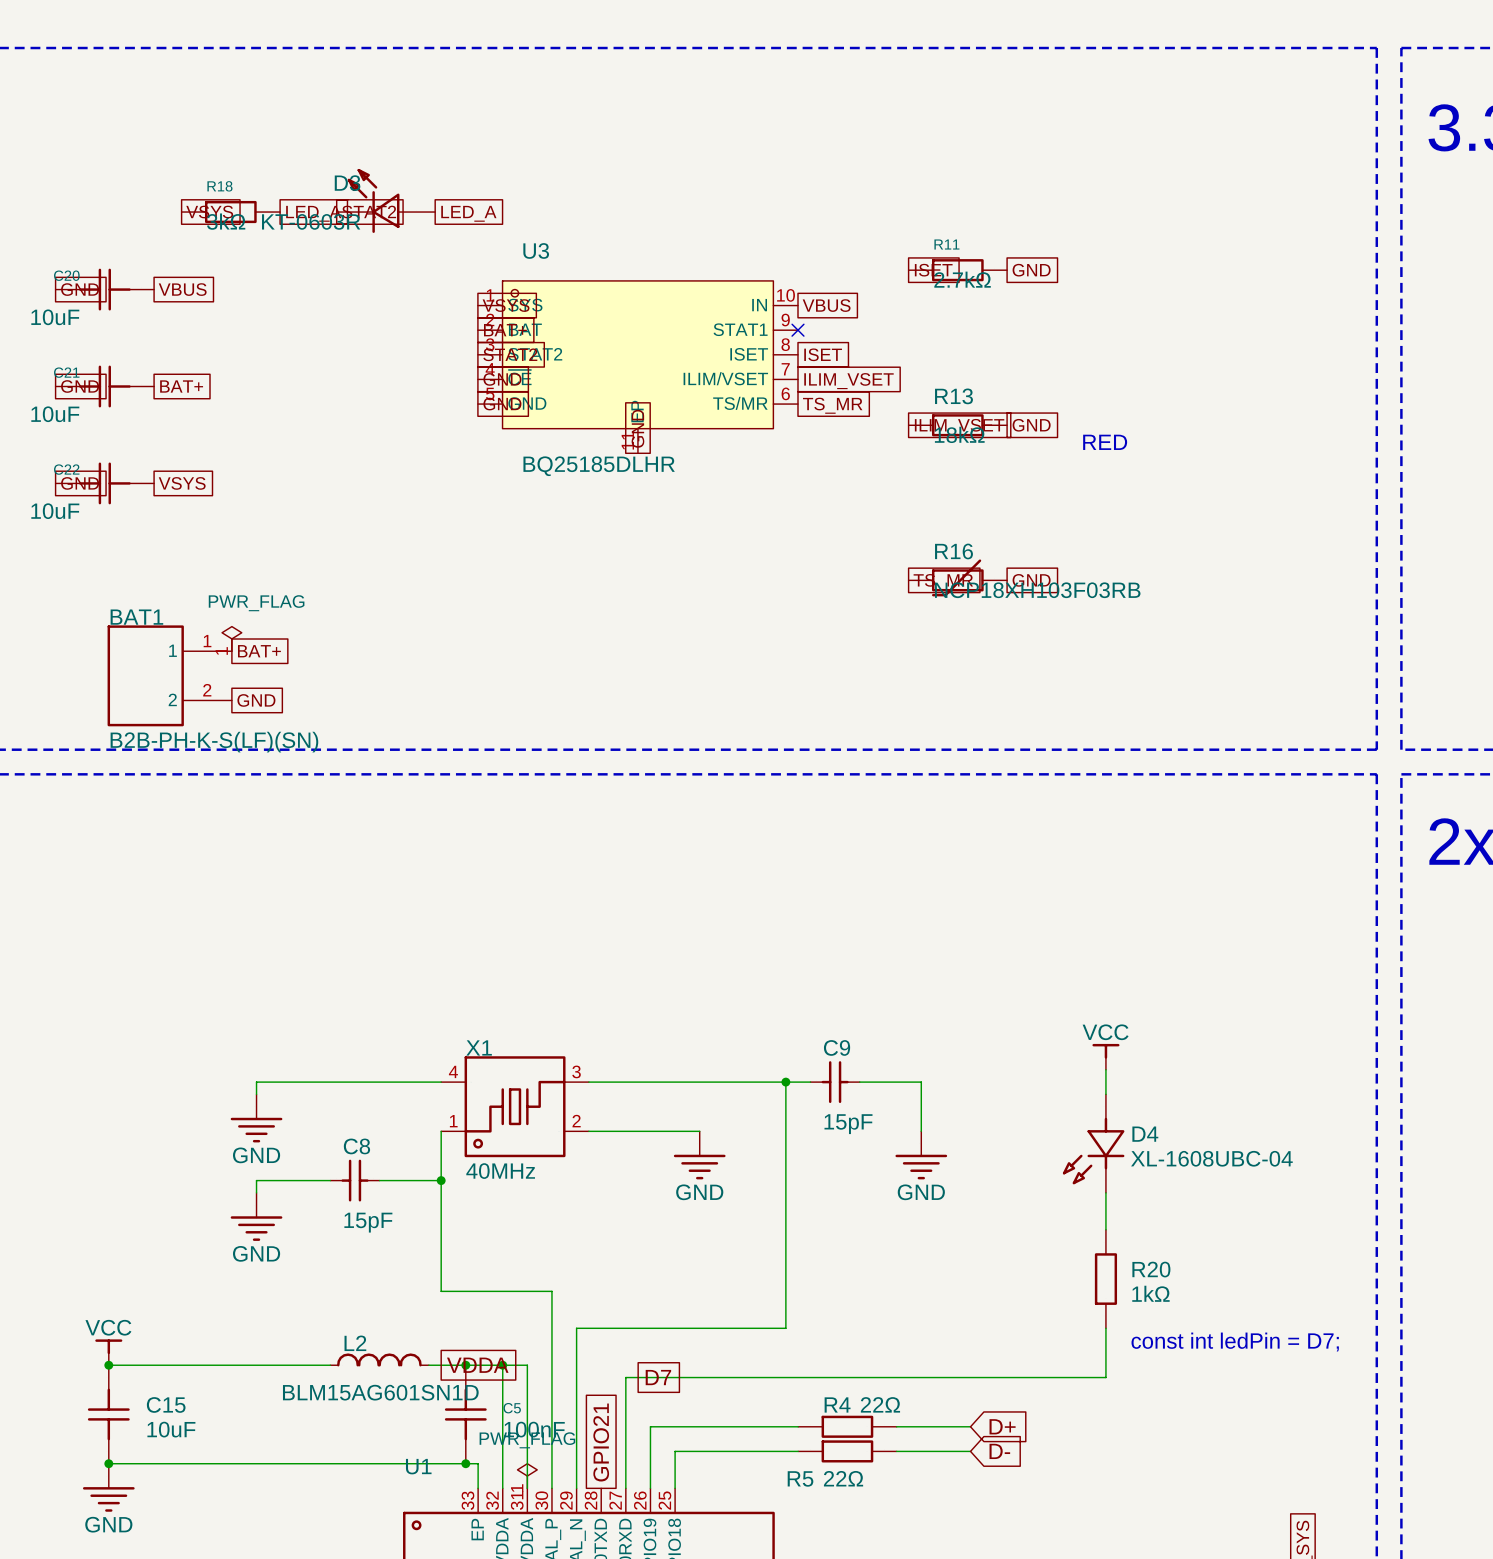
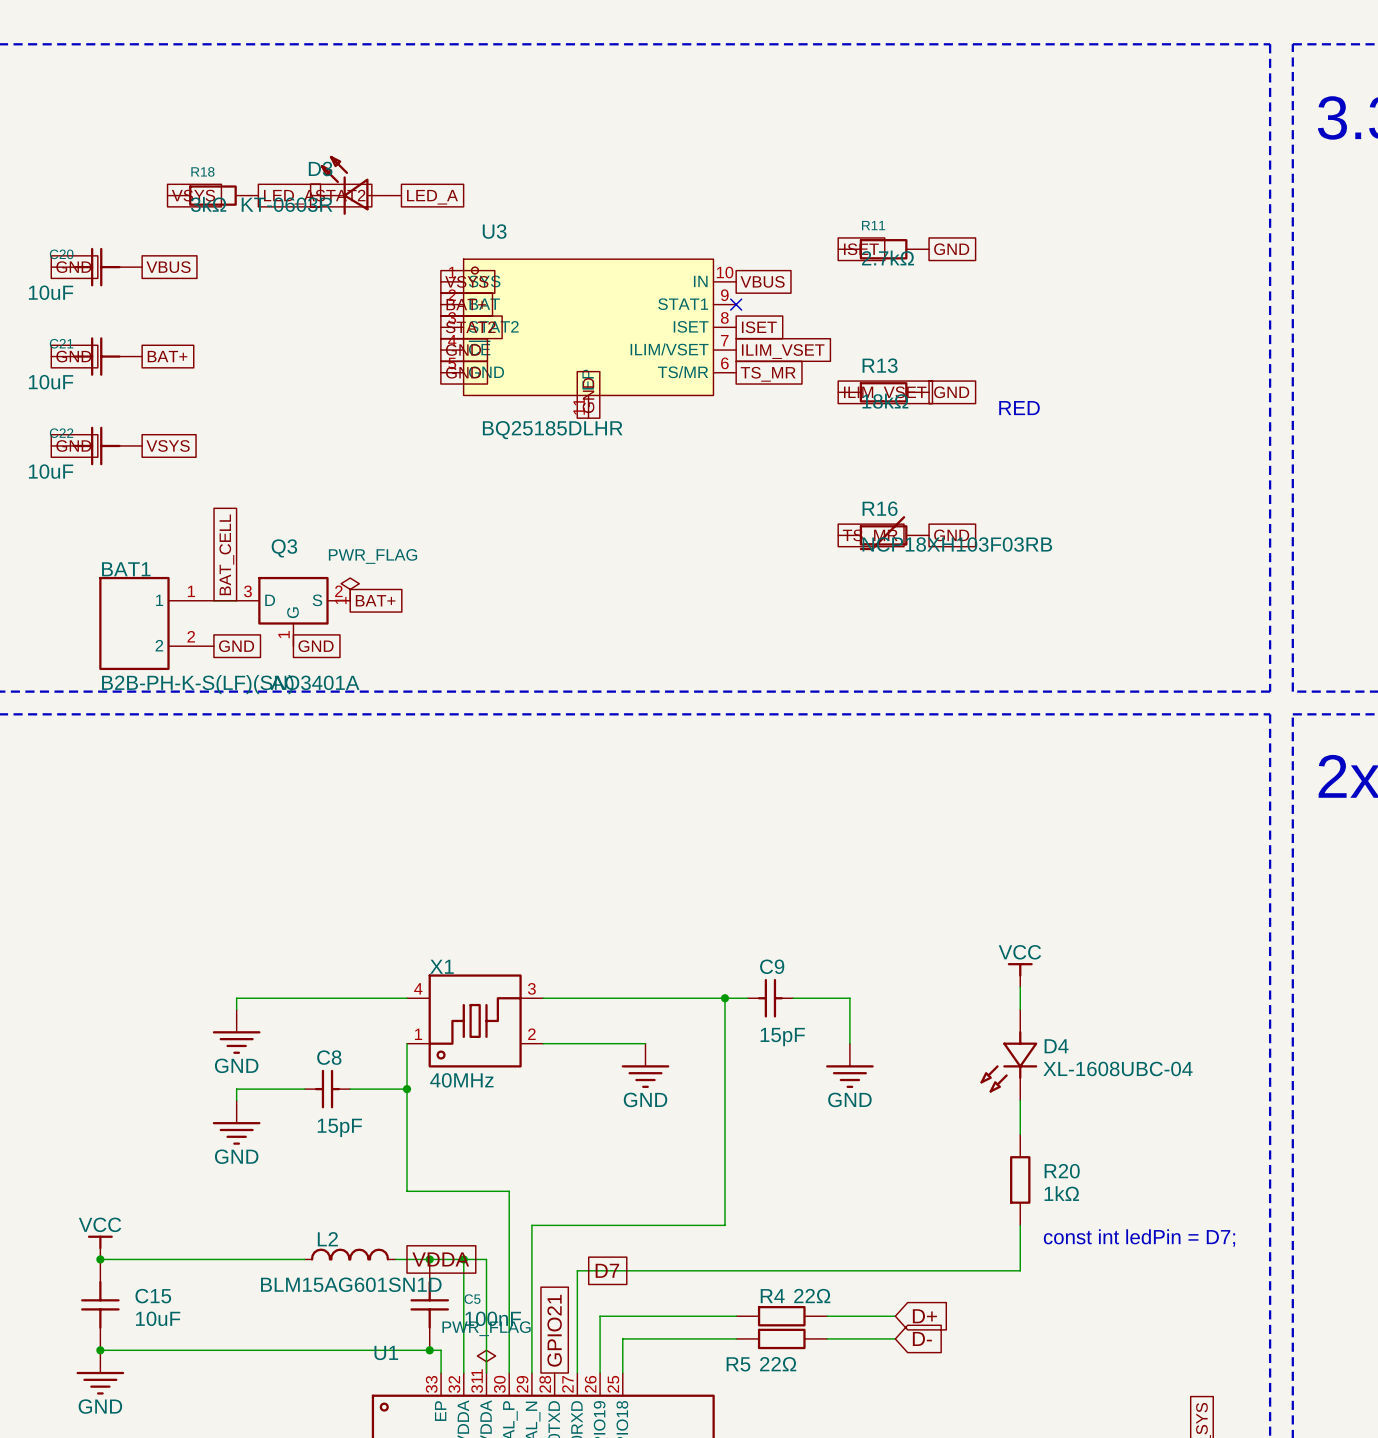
global label: none -> BAT_CELL (226, 554)
power symbol position: PWR_FLAG (231, 638) -> PWR_FLAG (350, 589)
global label position: BAT+ (259, 651) -> BAT+ (375, 600)
Q3: none -> AO3401A (293, 611)
global label: none -> GND (316, 646)

